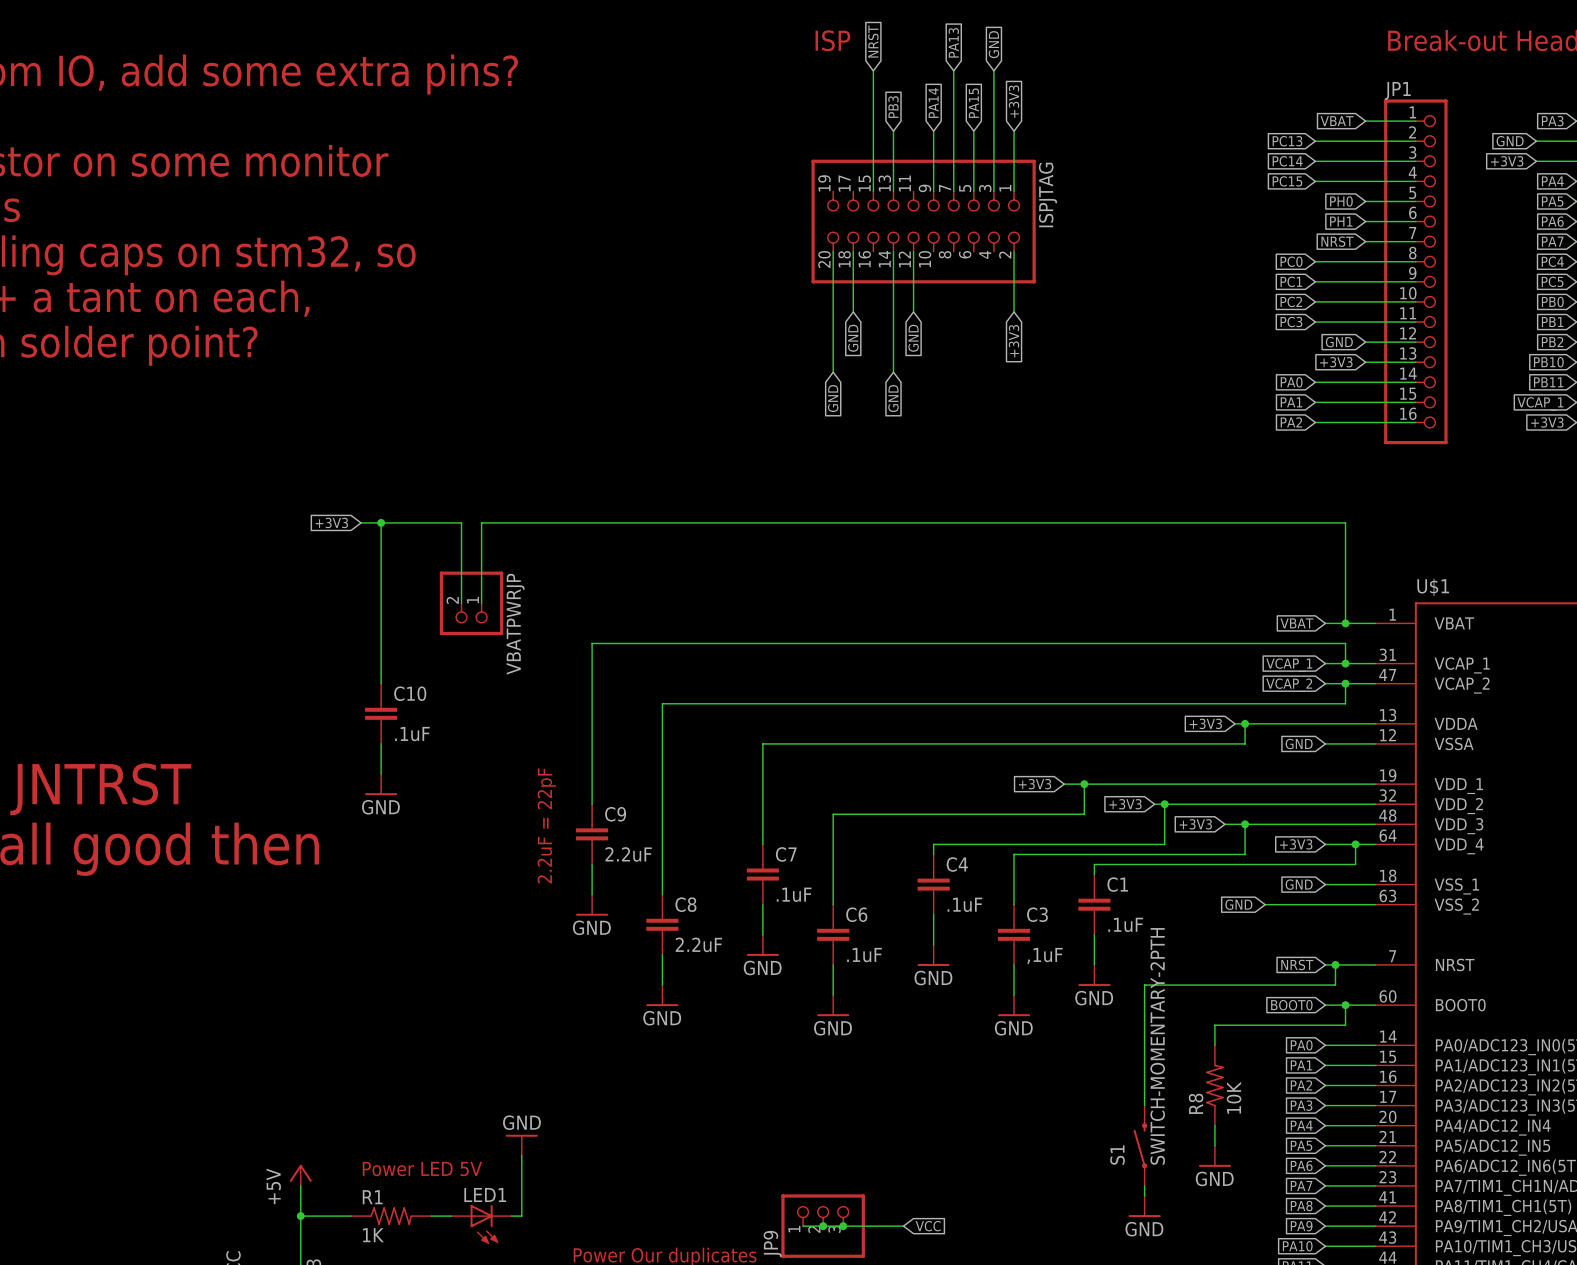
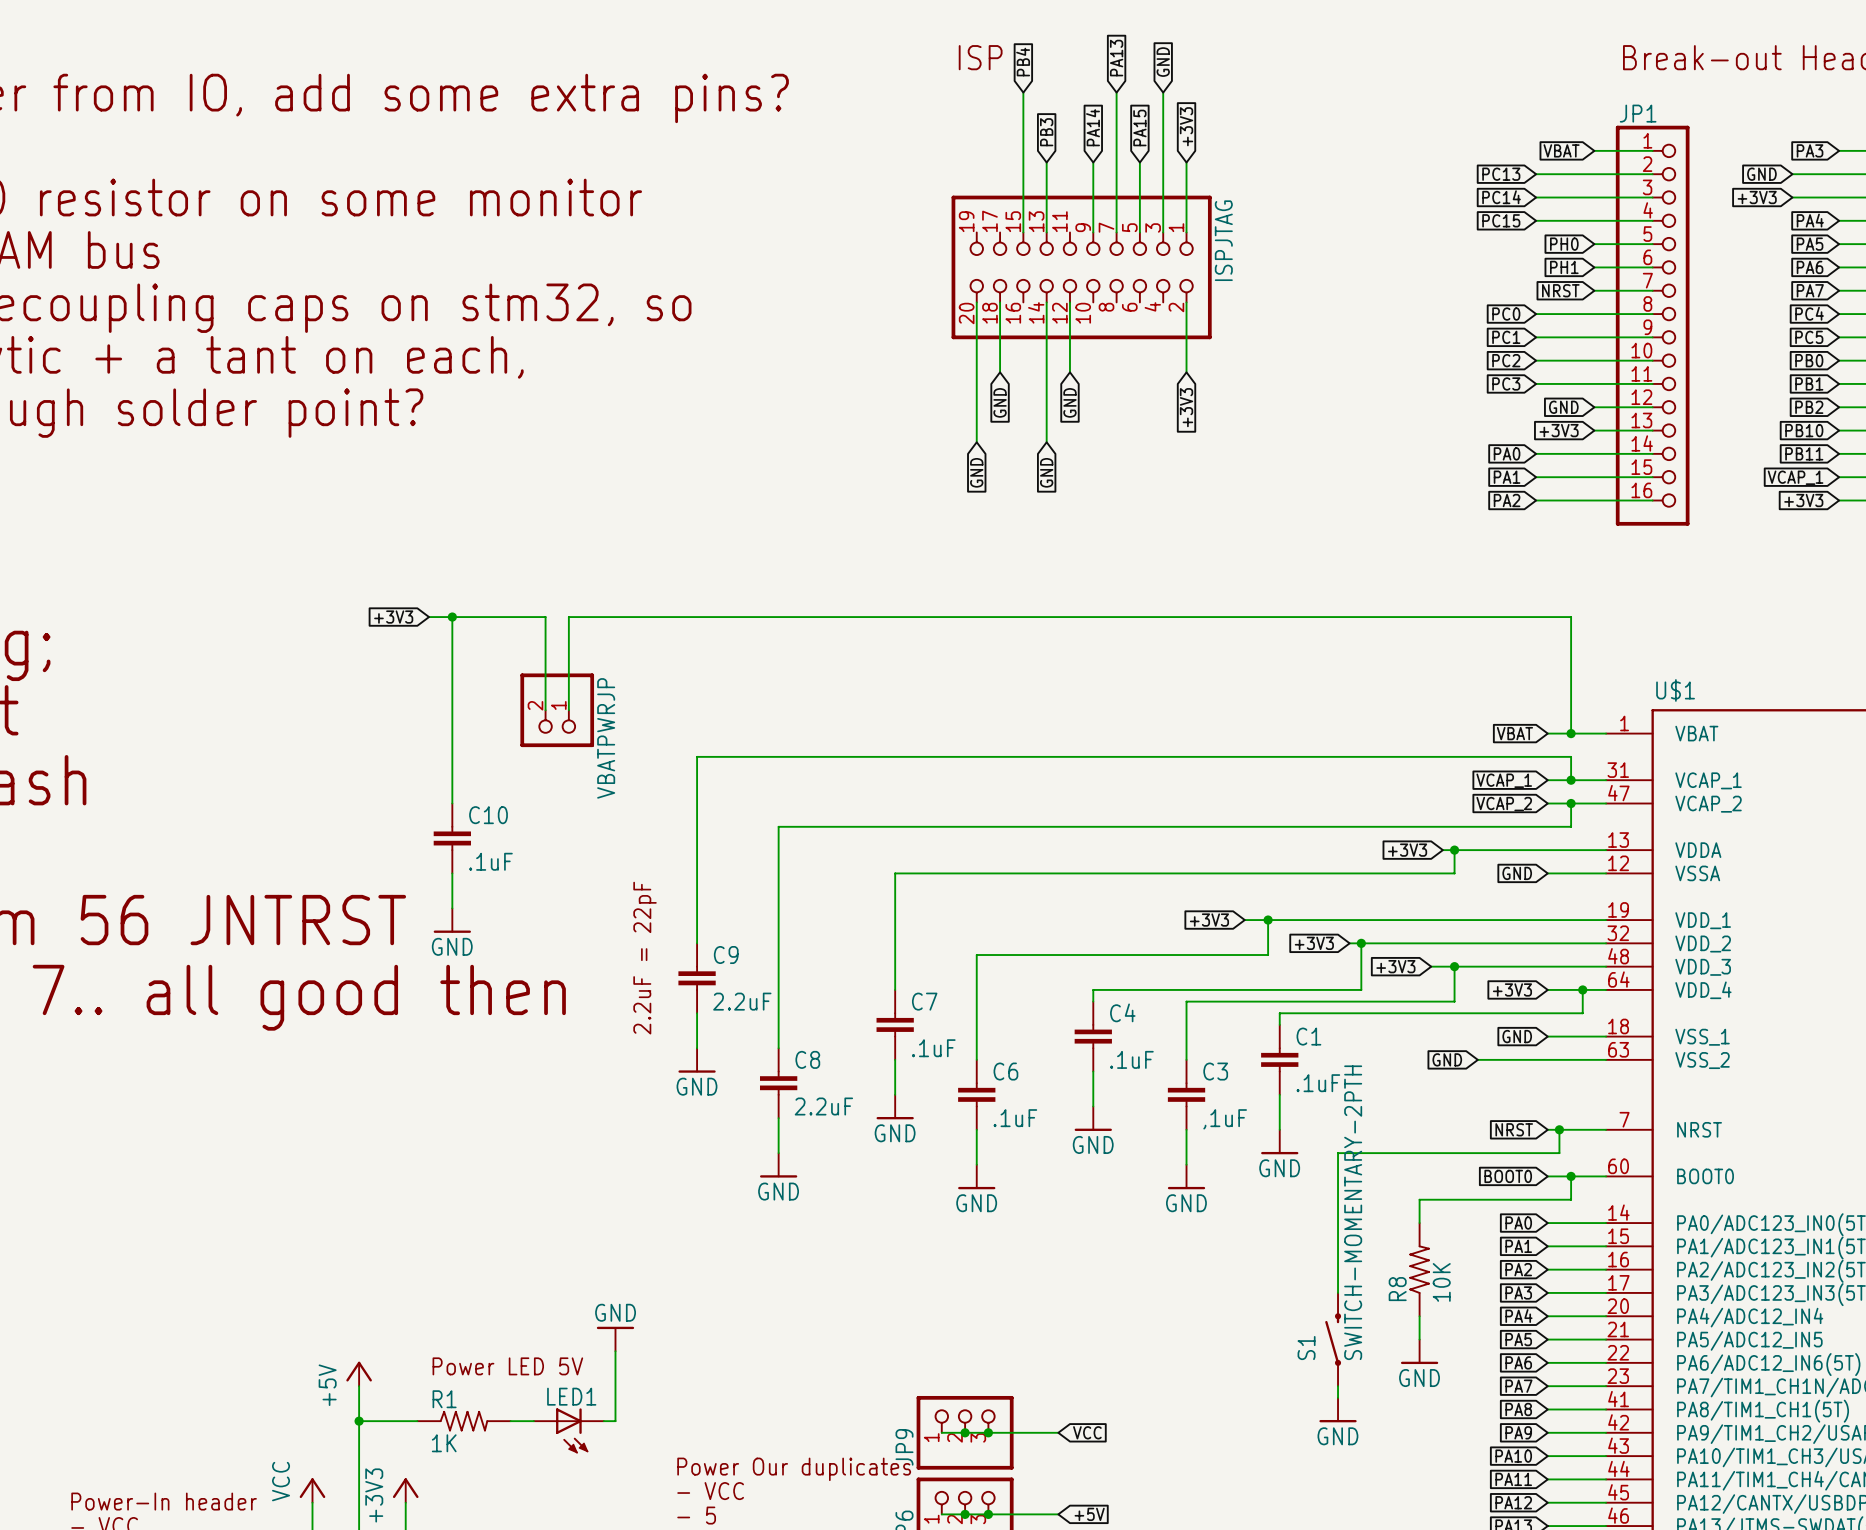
global label: NRST (873, 41) -> PB4 (1023, 62)

